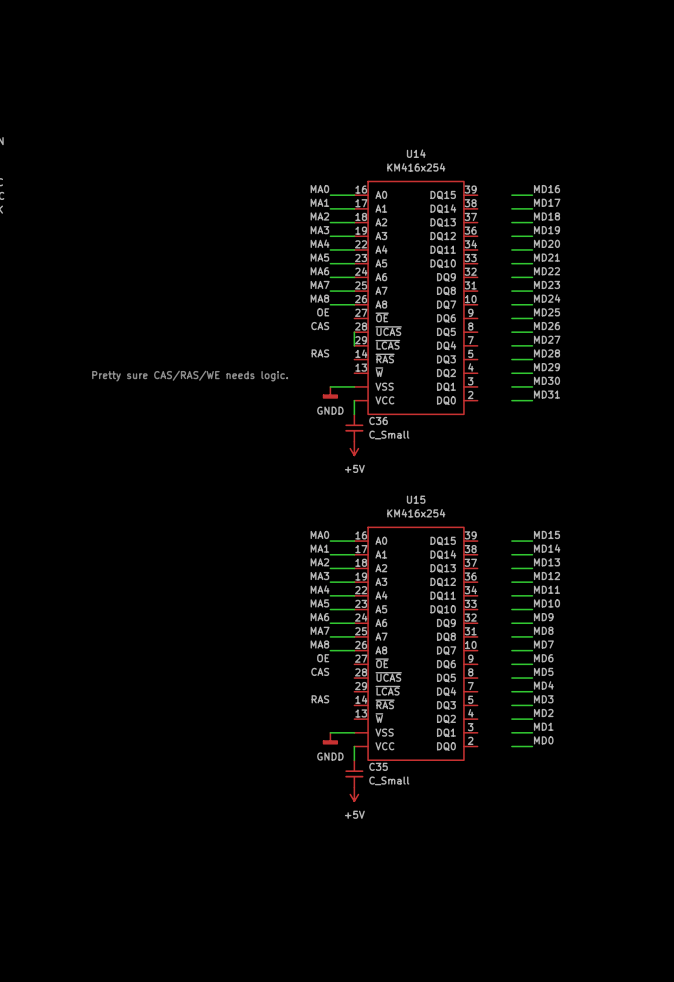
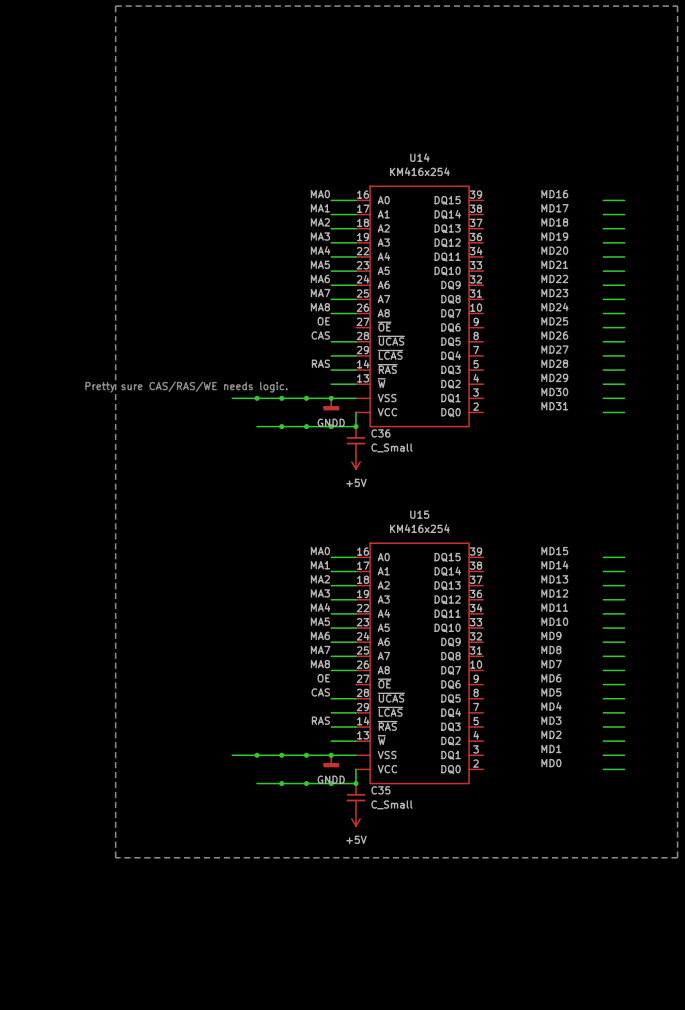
line: none -> (115, 6) (677, 6) (677, 857) (115, 857) (115, 6)
wire: (511, 195) (532, 195) -> (603, 200) (624, 200)
wire: (511, 208) (532, 208) -> (603, 214) (624, 214)
wire: (511, 222) (532, 222) -> (603, 228) (624, 228)
wire: (511, 236) (532, 236) -> (603, 242) (624, 242)
wire: (511, 249) (532, 249) -> (603, 256) (624, 256)
wire: (511, 263) (532, 263) -> (603, 271) (624, 271)
wire: (511, 277) (532, 277) -> (603, 285) (624, 285)
wire: (511, 291) (532, 291) -> (603, 299) (624, 299)
wire: (511, 304) (532, 304) -> (603, 313) (624, 313)
wire: (511, 318) (532, 318) -> (603, 327) (624, 327)
wire: (354, 332) (354, 345) -> (355, 341) (331, 341)
wire: (511, 332) (532, 332) -> (603, 341) (624, 341)
wire: none -> (331, 355) (355, 355)
wire: (511, 345) (532, 345) -> (603, 355) (624, 355)
wire: none -> (331, 370) (355, 370)
wire: (511, 359) (532, 359) -> (603, 370) (624, 370)
wire: none -> (331, 384) (355, 384)
wire: (511, 373) (532, 373) -> (603, 384) (624, 384)
wire: none -> (232, 398) (331, 398)
junction: none -> (257, 398)
junction: none -> (281, 398)
junction: none -> (306, 398)
junction: none -> (331, 398)
wire: (511, 386) (532, 386) -> (603, 398) (624, 398)
wire: (511, 400) (532, 400) -> (603, 412) (624, 412)
wire: none -> (257, 426) (355, 426)
junction: none -> (281, 426)
junction: none -> (306, 426)
junction: none -> (331, 426)
junction: none -> (355, 426)
wire: (511, 541) (532, 541) -> (603, 557) (624, 557)
wire: (511, 554) (532, 554) -> (603, 571) (624, 571)
wire: (511, 568) (532, 568) -> (603, 585) (624, 585)
wire: (511, 582) (532, 582) -> (603, 599) (624, 599)
wire: (511, 595) (532, 595) -> (603, 613) (624, 613)
wire: (511, 609) (532, 609) -> (603, 628) (624, 628)
wire: (511, 623) (532, 623) -> (603, 642) (624, 642)
wire: (511, 636) (532, 636) -> (603, 656) (624, 656)
wire: (511, 650) (532, 650) -> (603, 670) (624, 670)
wire: (511, 664) (532, 664) -> (603, 684) (624, 684)
wire: none -> (331, 698) (355, 698)
wire: (511, 678) (532, 678) -> (603, 698) (624, 698)
wire: none -> (331, 712) (355, 712)
wire: (511, 691) (532, 691) -> (603, 712) (624, 712)
wire: none -> (331, 727) (355, 727)
wire: (511, 705) (532, 705) -> (603, 727) (624, 727)
wire: none -> (331, 741) (355, 741)
wire: (511, 719) (532, 719) -> (603, 741) (624, 741)
wire: none -> (232, 755) (331, 755)
junction: none -> (257, 755)
junction: none -> (281, 755)
junction: none -> (306, 755)
junction: none -> (331, 755)
wire: (511, 732) (532, 732) -> (603, 755) (624, 755)
wire: (511, 746) (532, 746) -> (603, 769) (624, 769)
wire: none -> (257, 783) (355, 783)
junction: none -> (281, 783)
junction: none -> (306, 783)
junction: none -> (331, 783)
junction: none -> (355, 783)

